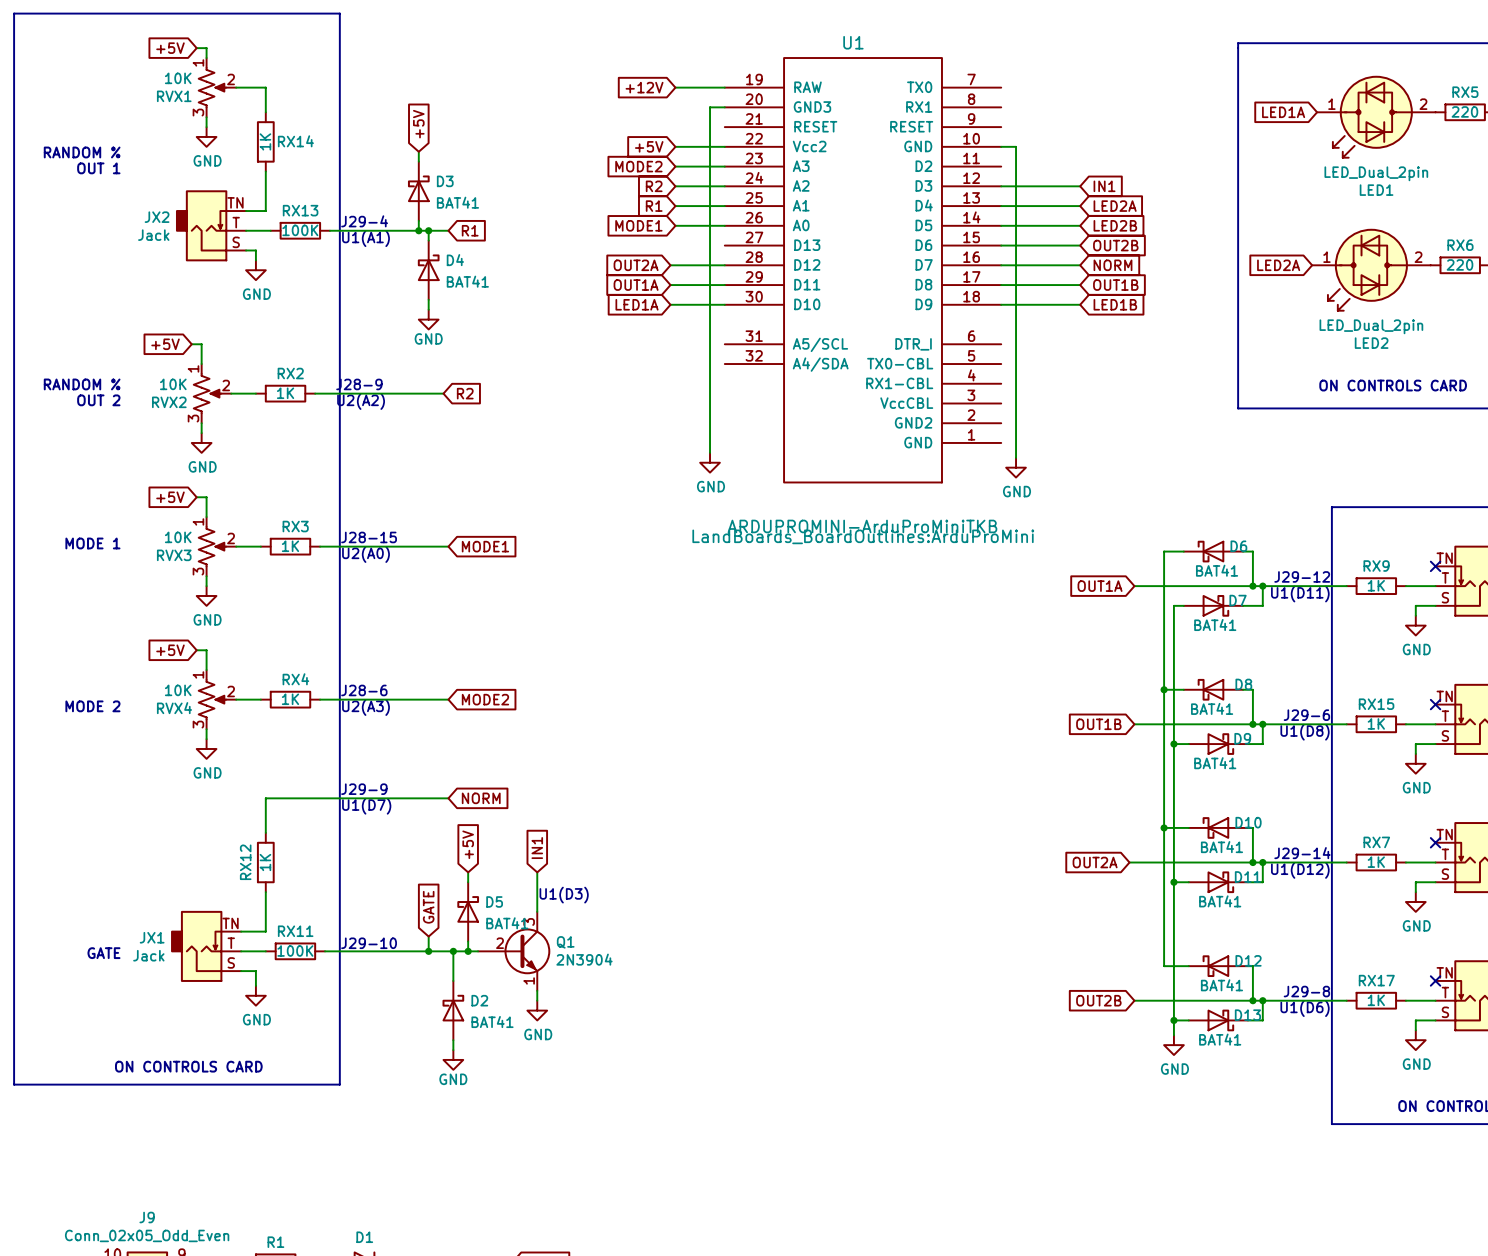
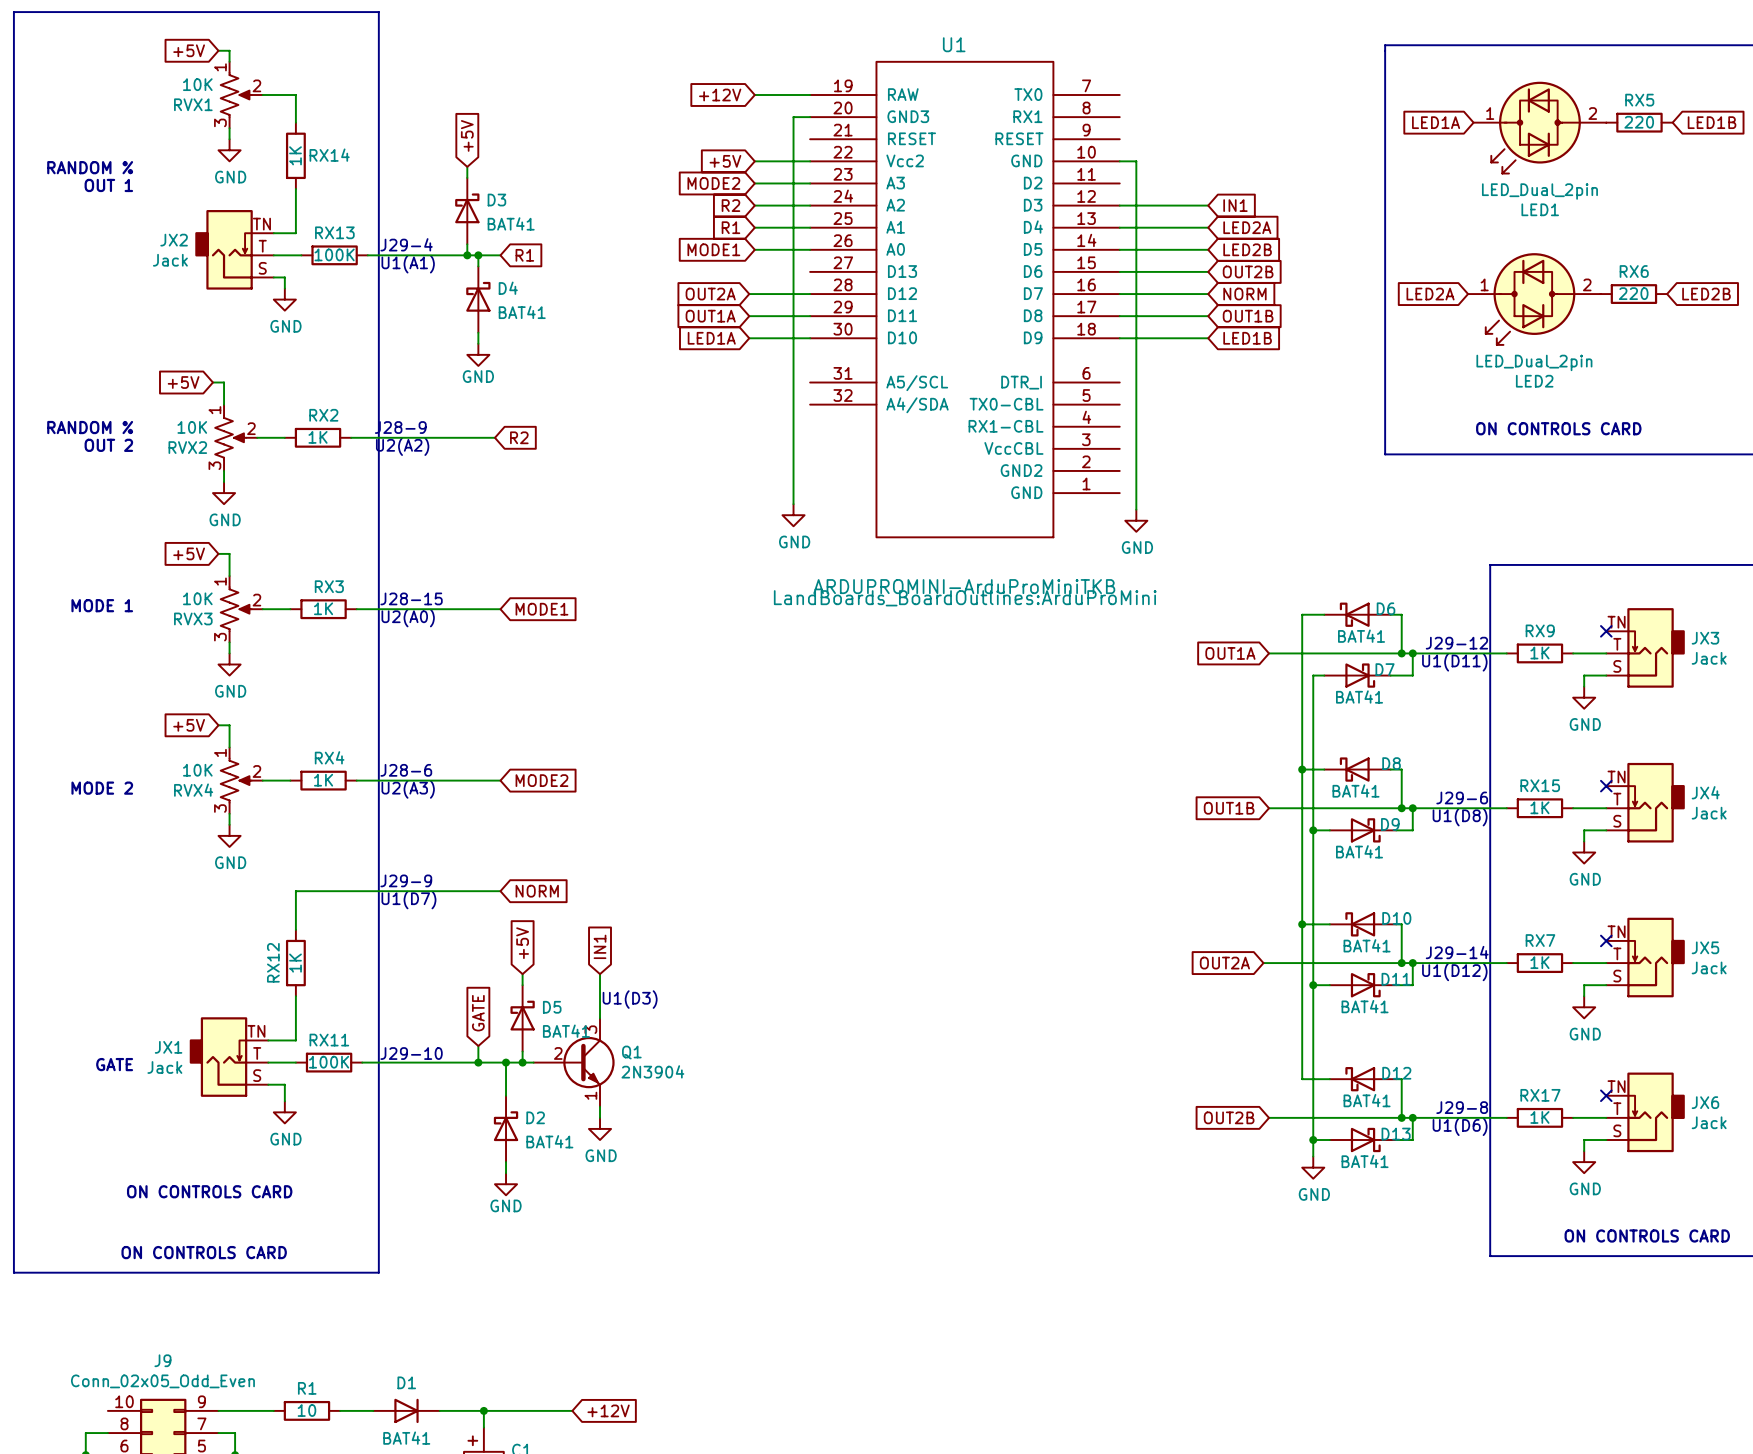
line: (14, 1084) (339, 1084) -> (13, 1211) (13, 1272) (378, 1272) (378, 1211)
text: none -> ON CONTROLS CARD (204, 1252)

